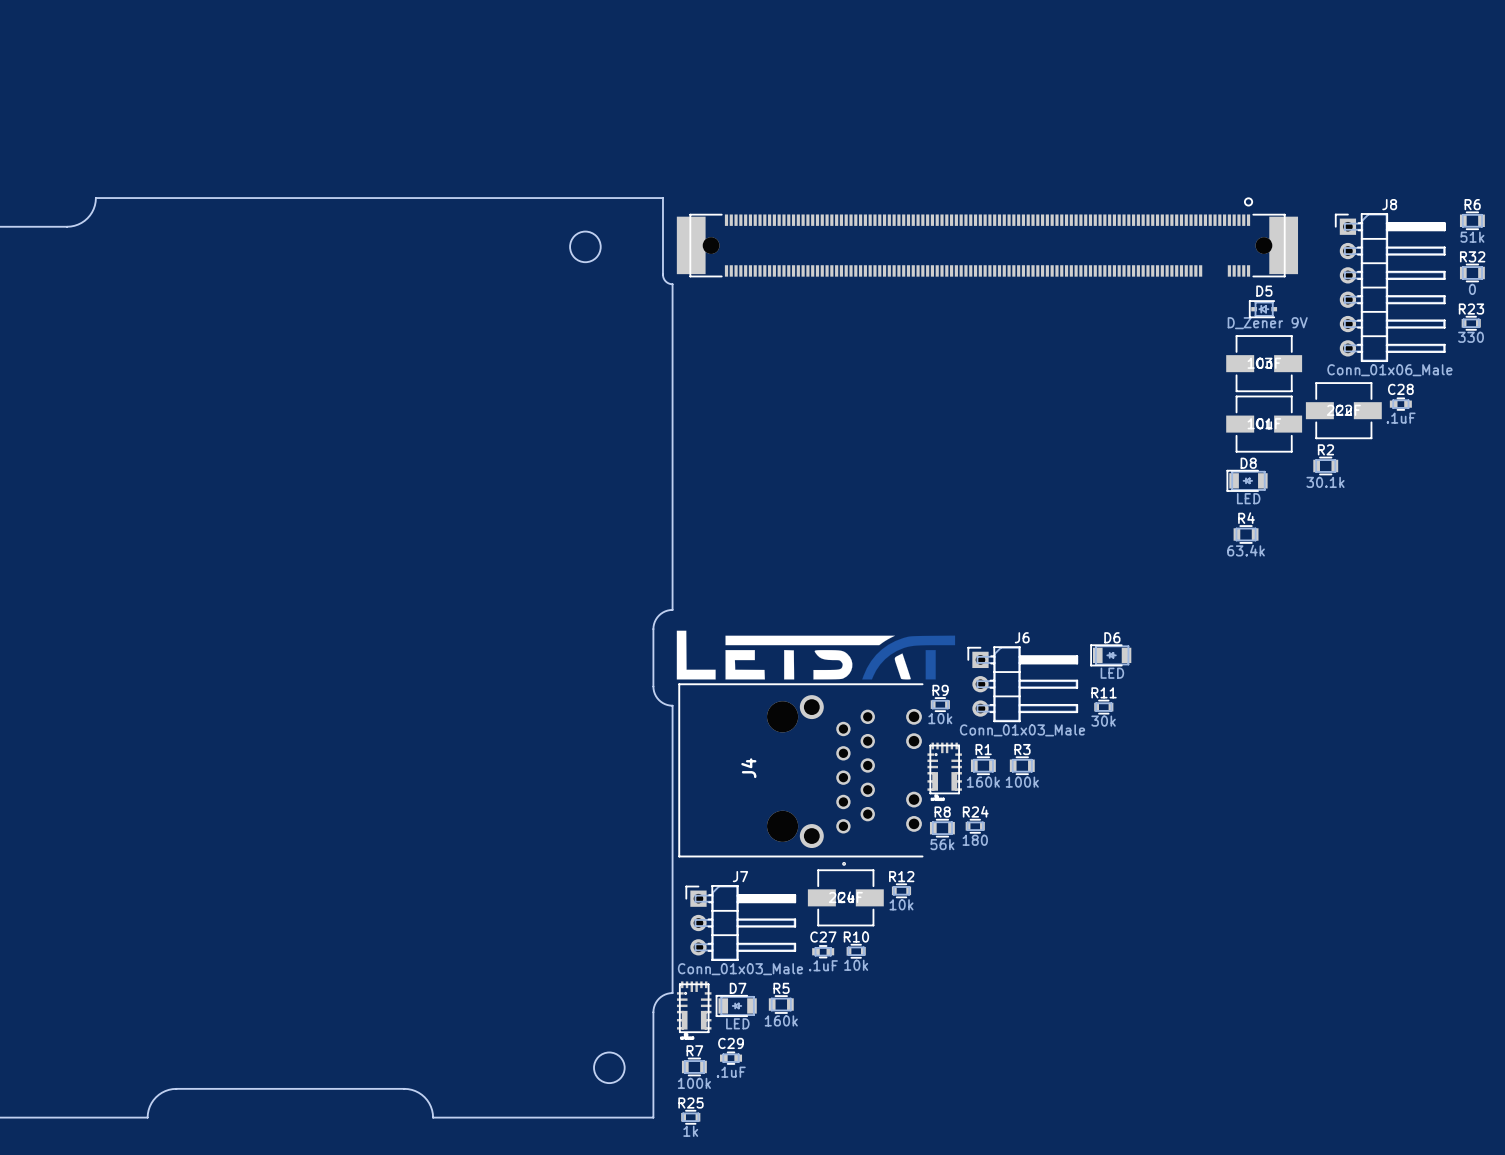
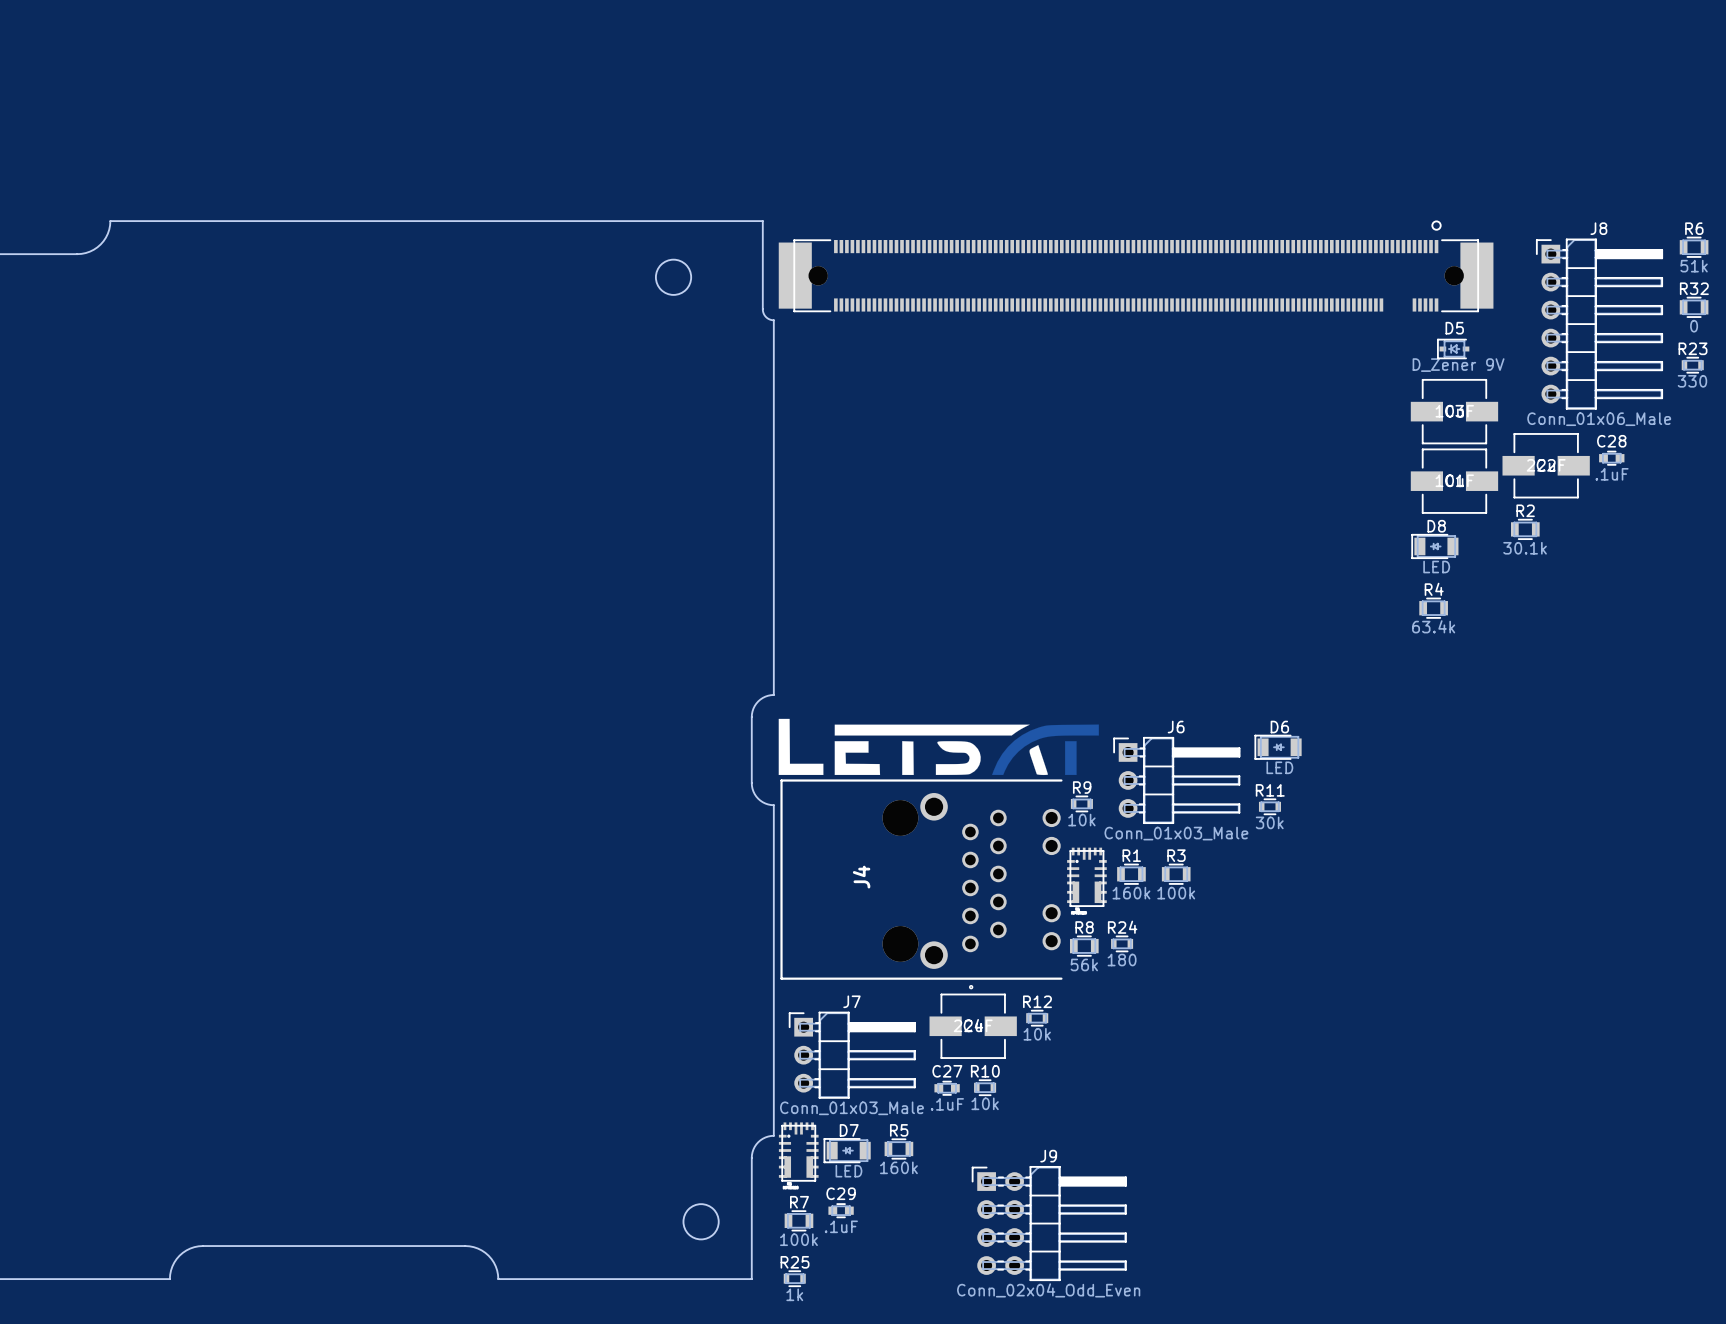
J9: none -> Conn_02x04_Odd_Even (1049, 1223)

